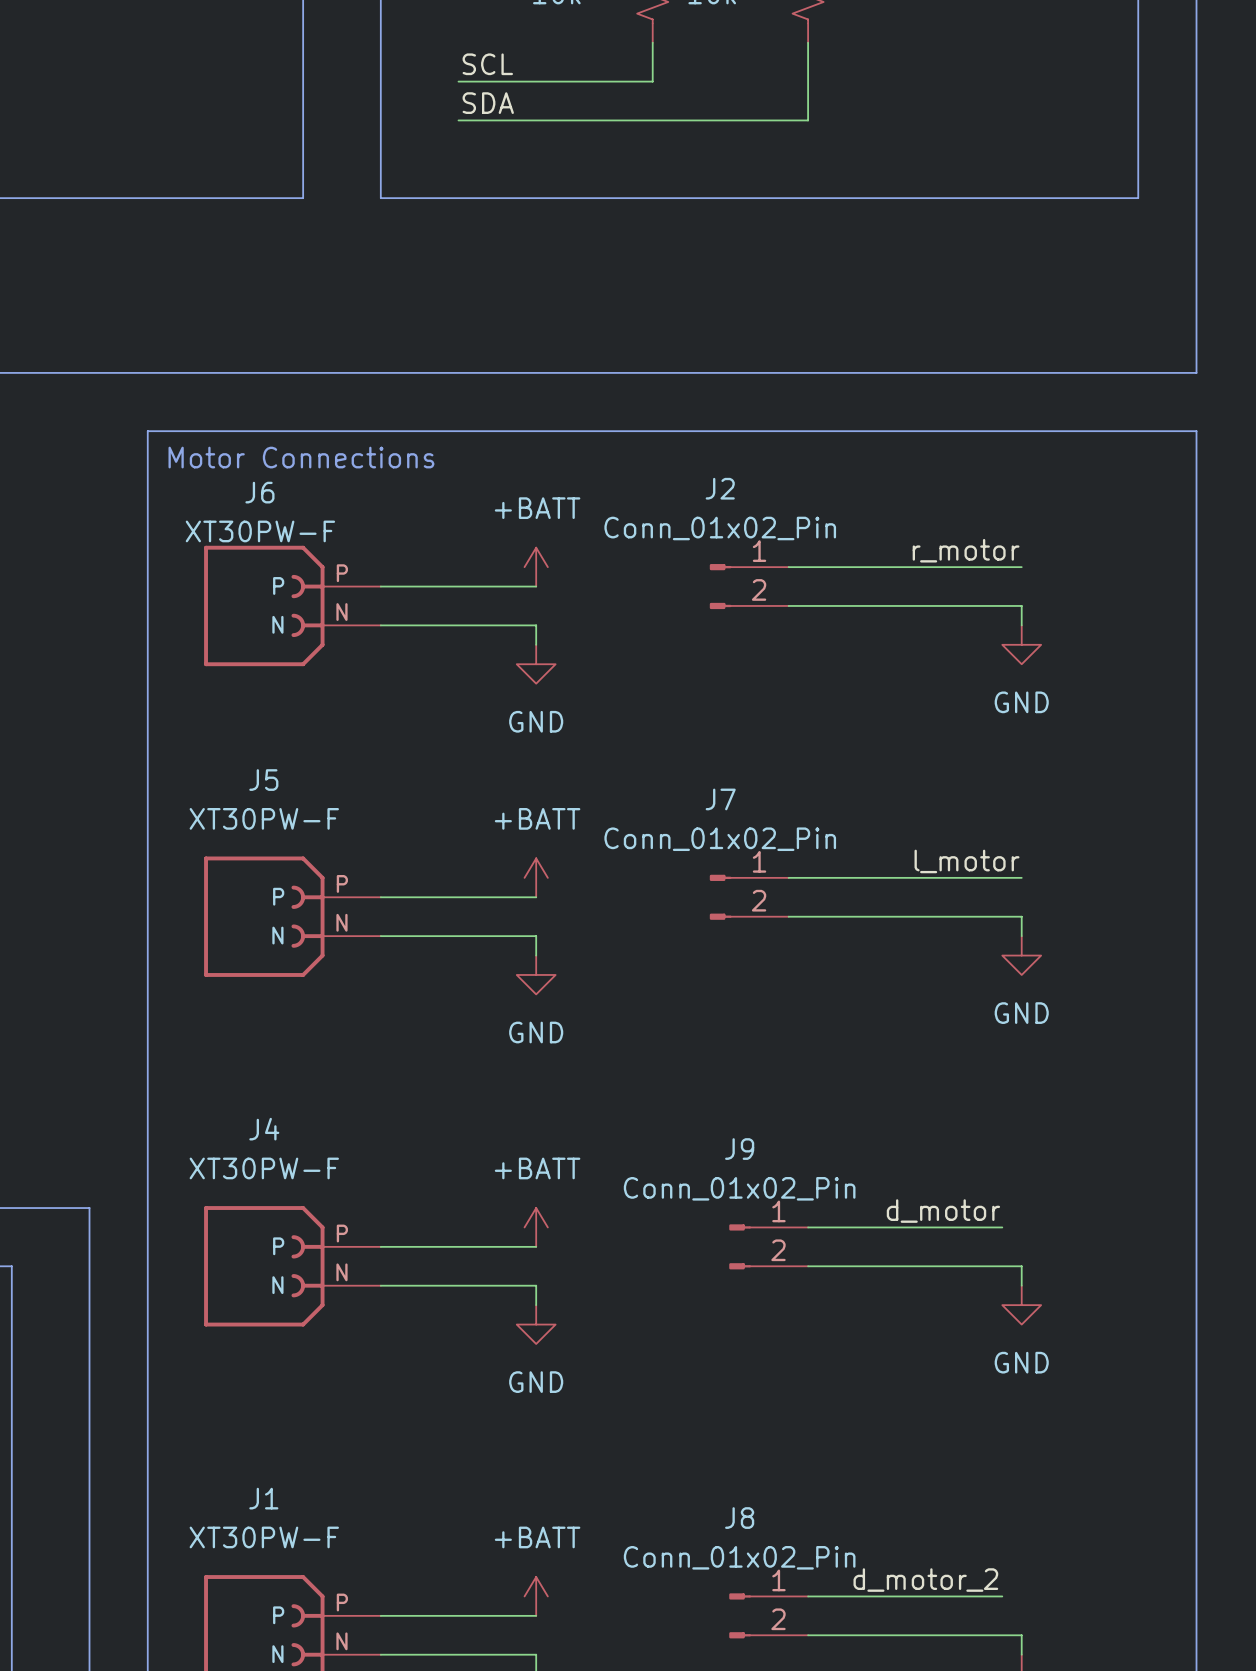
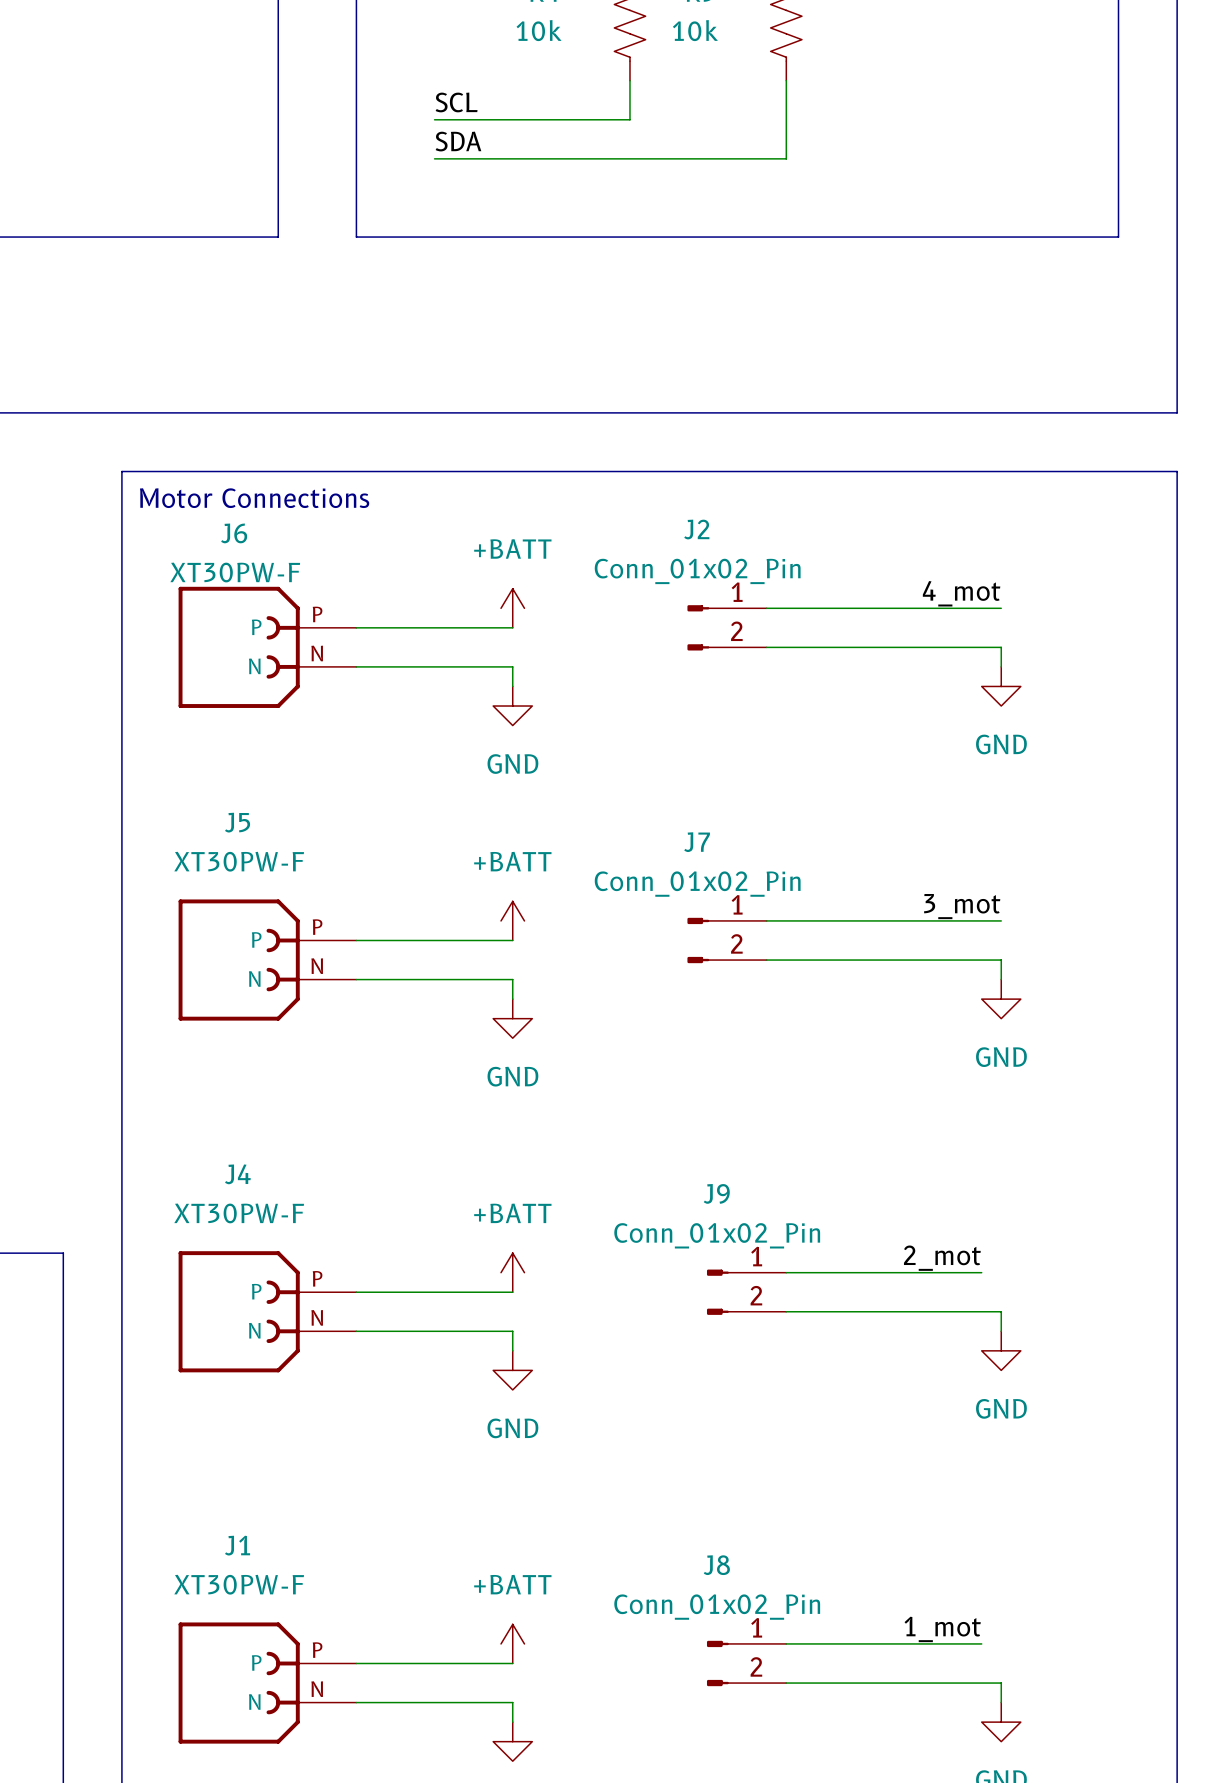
label: r_motor (966, 550) -> 4_mot (961, 593)
label: l_motor (967, 861) -> 3_mot (962, 906)
label: d_motor (943, 1211) -> 2_mot (942, 1258)
label: d_motor_2 (925, 1580) -> 1_mot (942, 1629)

